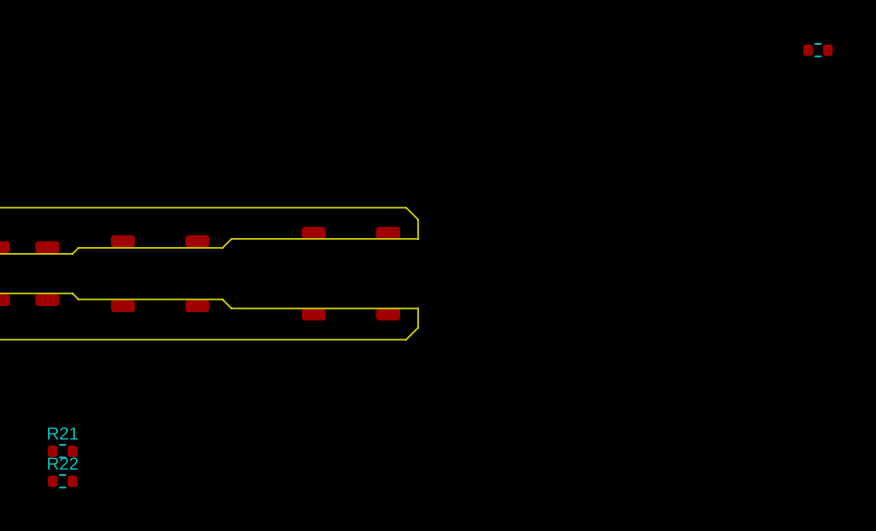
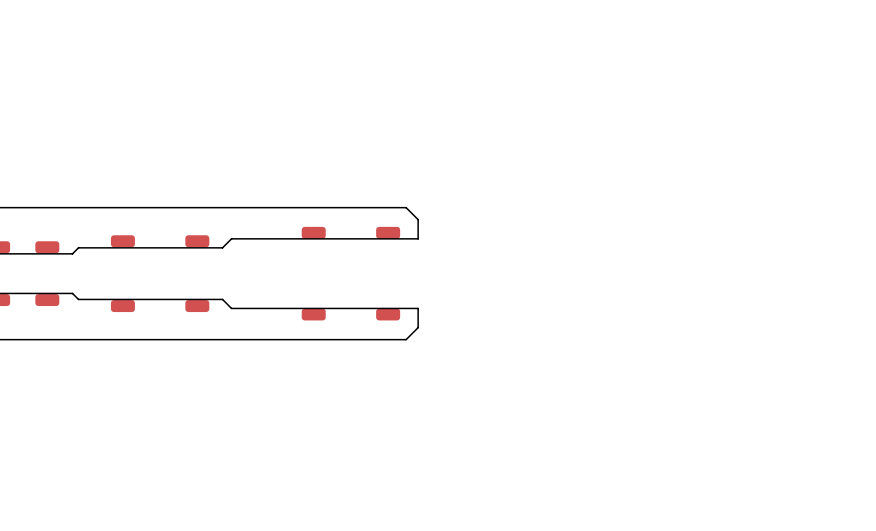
part: (817, 50) -> none
R21: (62, 451) -> none
R22: (62, 481) -> none

